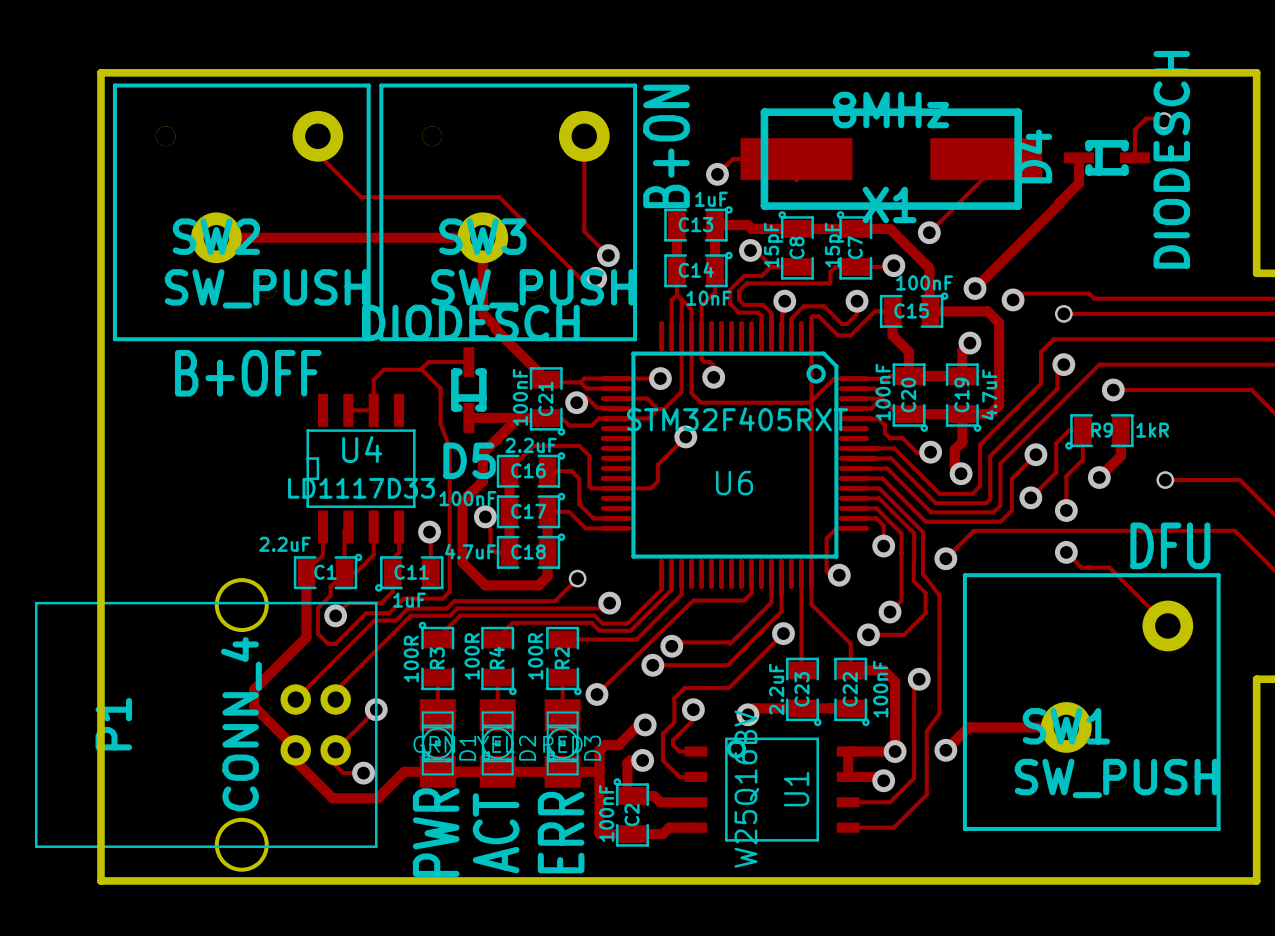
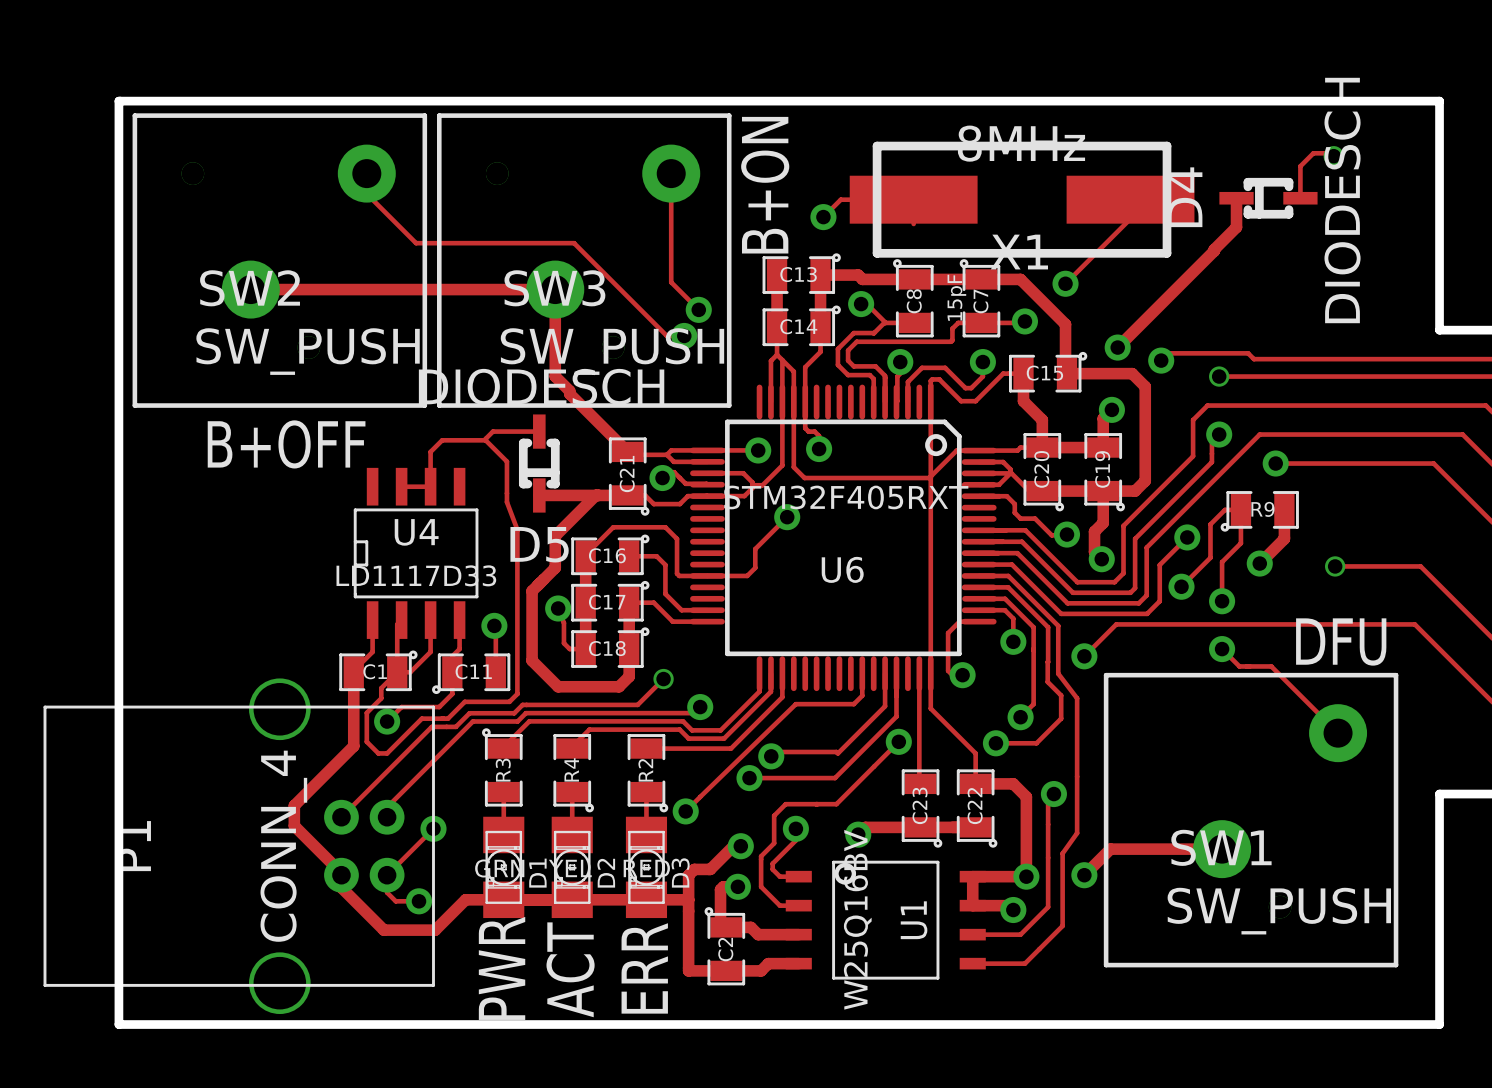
C13 value: 1uF (711, 199) -> none
C8 value: 15pF (773, 245) -> none
C15 value: 100nF (924, 282) -> none
C14 value: 10nF (708, 298) -> none
C20 value: 100nF (883, 392) -> none
C19 value: 4.7uF (989, 394) -> none
C21 value: 100nF (520, 397) -> none
R9 value: 1kR (1152, 430) -> none
C16 value: 2.2uF (531, 445) -> none
C17 value: 100nF (467, 498) -> none
C1 value: 2.2uF (284, 544) -> none
C18 value: 4.7uF (470, 551) -> none
C11 value: 1uF (409, 600) -> none
R4 value: 100R (472, 656) -> none
R2 value: 100R (535, 656) -> none
R3 value: 100R (411, 658) -> none
C23 value: 2.2uF (776, 689) -> none
C22 value: 100nF (880, 689) -> none
C2 value: 100nF (606, 813) -> none

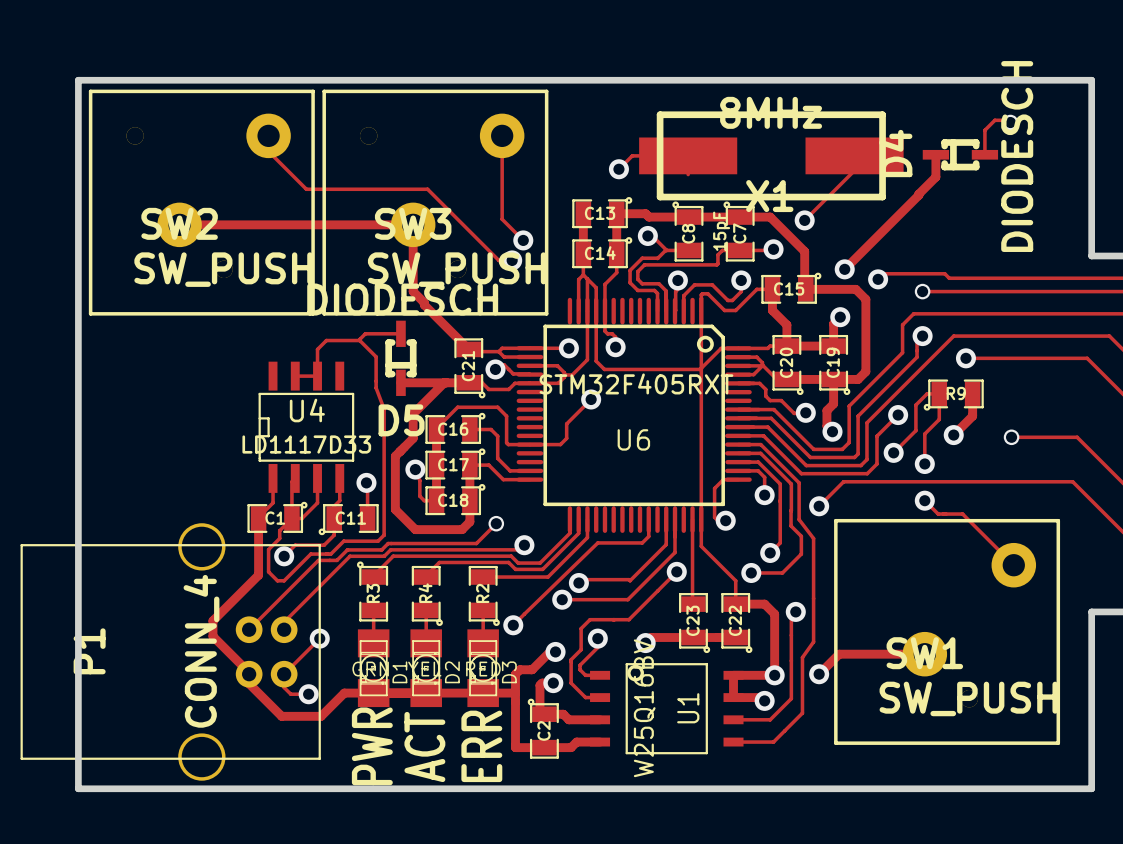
text: B+ON (765, 185) -> none
text: B+OFF (286, 444) -> none
text: DFU (1341, 641) -> none

